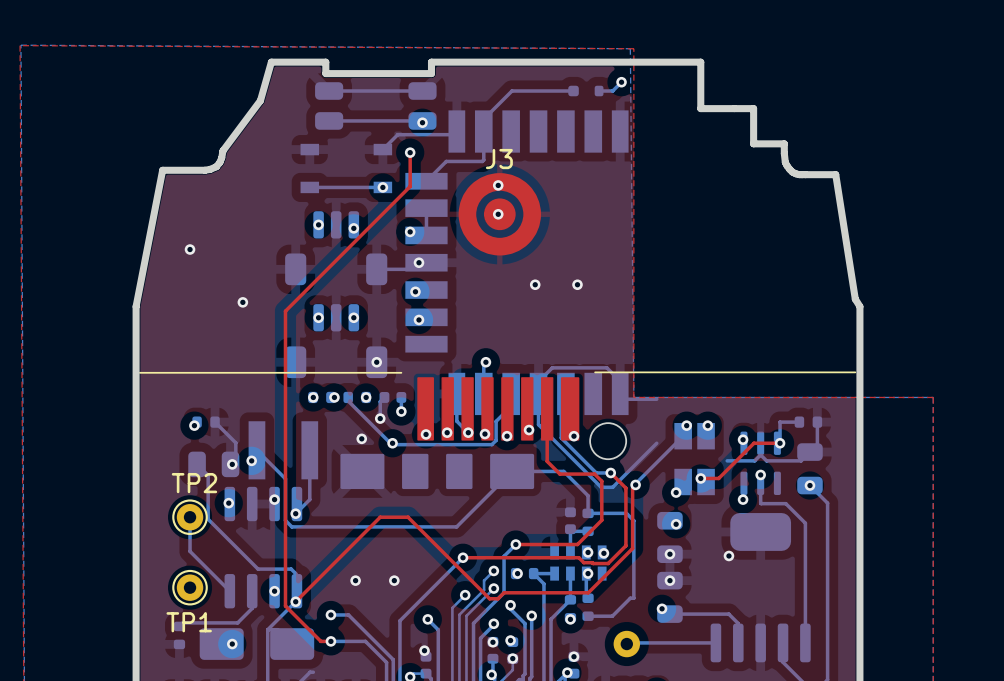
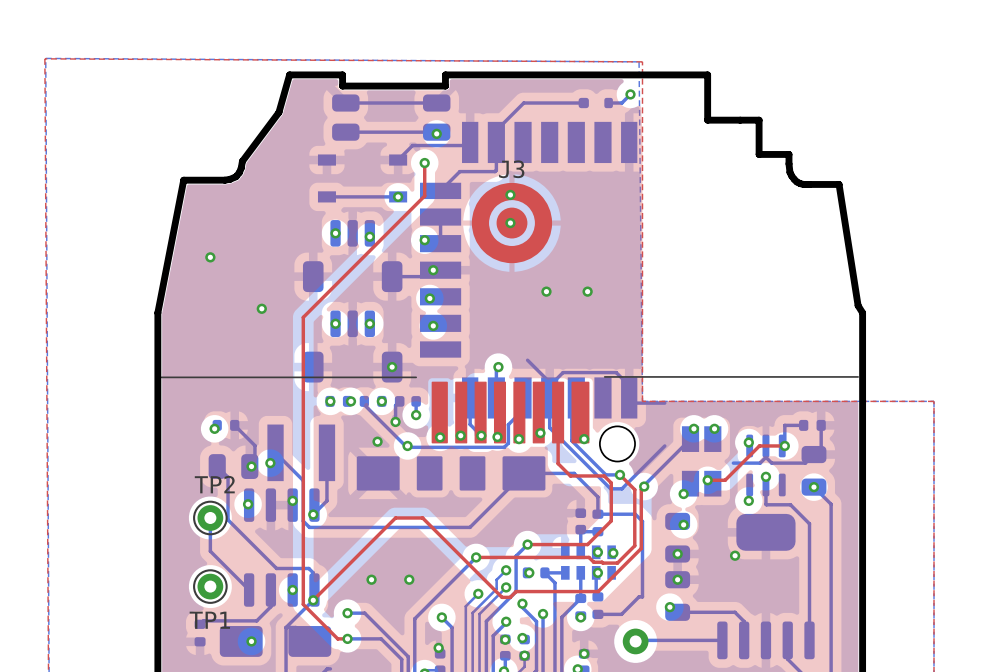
bottom track: none -> (527, 360) (549, 382) (549, 385)

